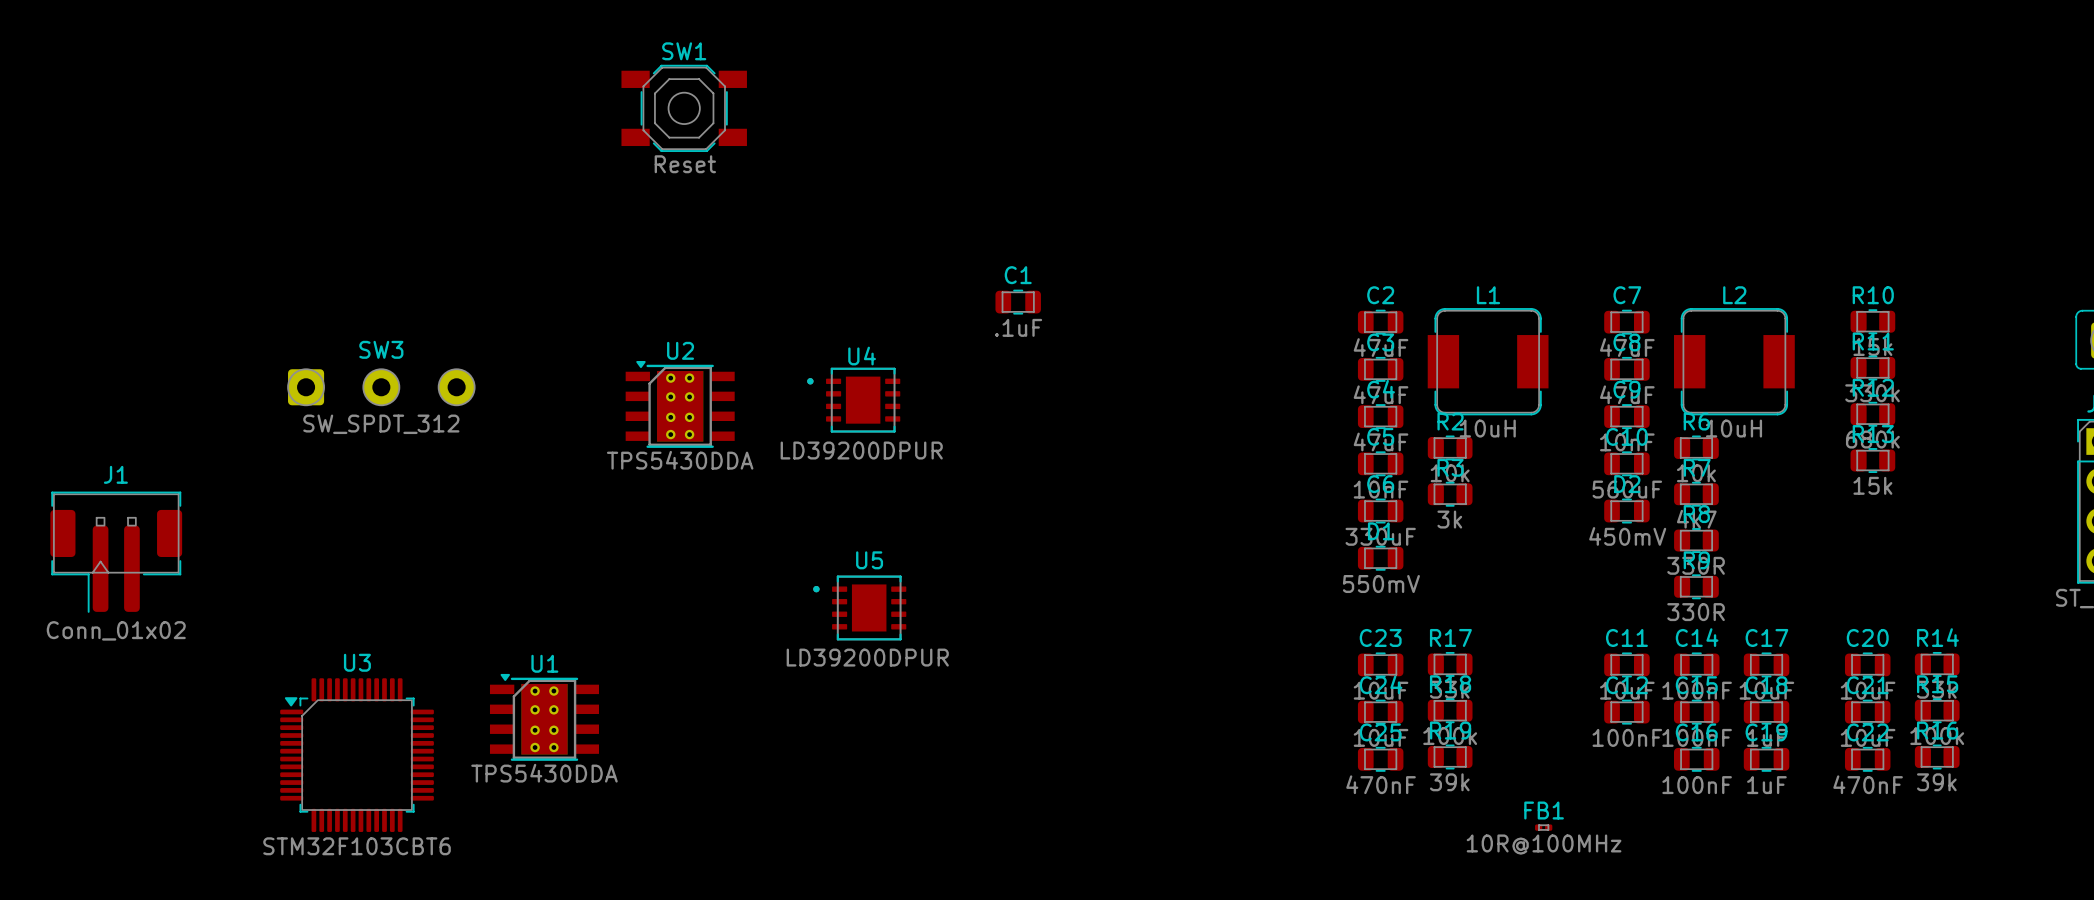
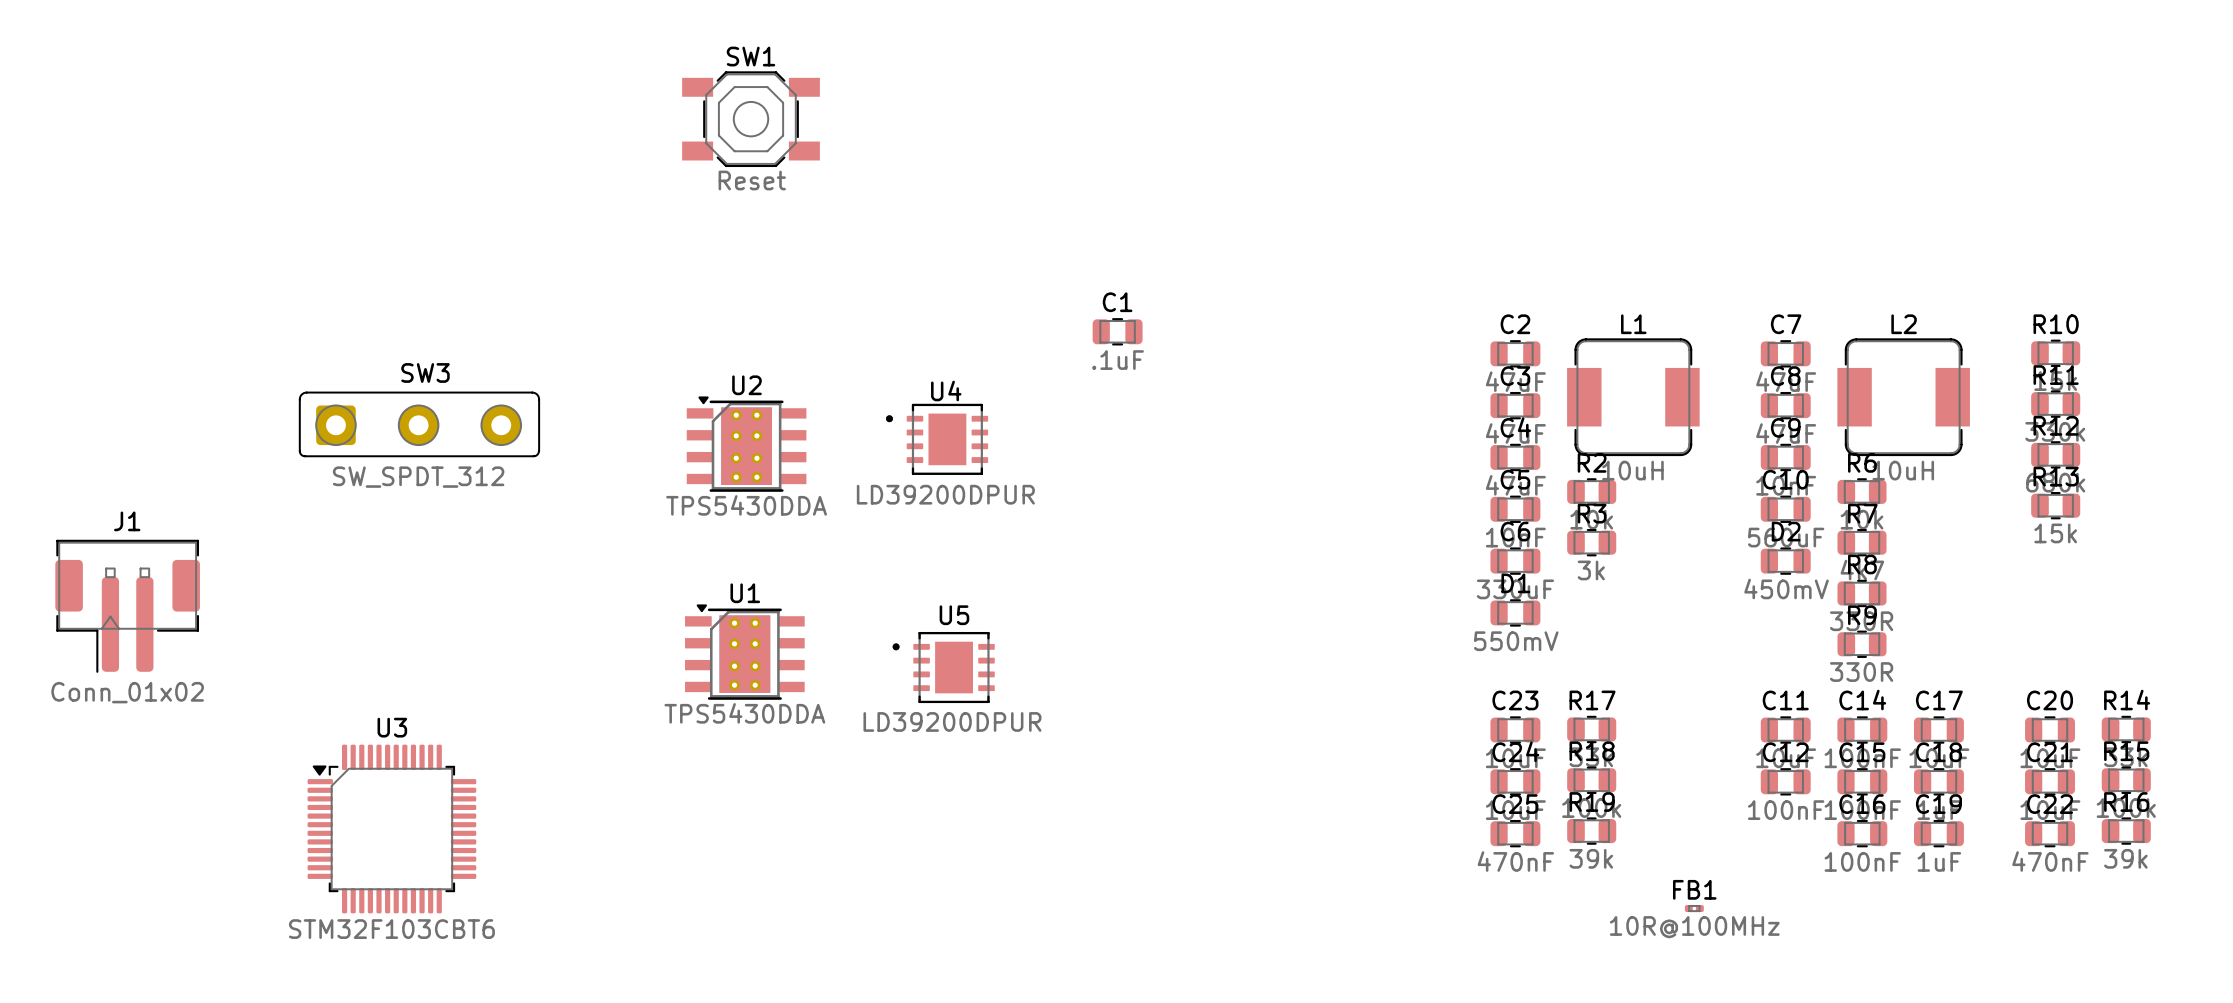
SW3 footprint: [287, 368, 476, 407] -> [298, 391, 540, 458]
U1 position: (544, 717) -> (744, 652)

